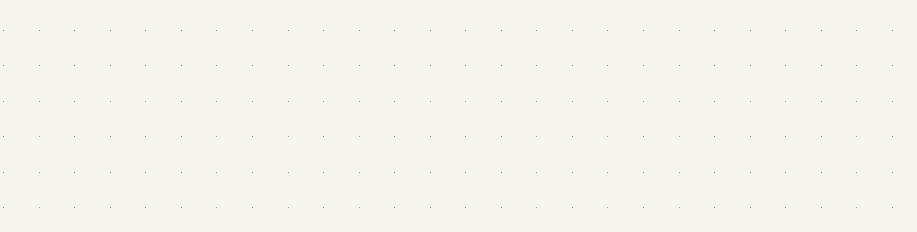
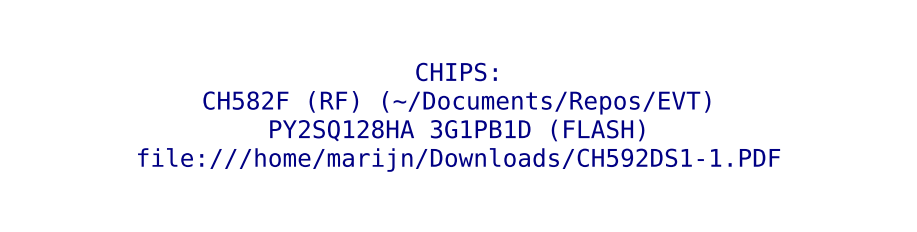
text: none -> CHIPS: (456, 72)
text: none -> CH582F (RF) (~/Documents/Repos/EVT) (456, 102)
text: none -> PY2SQ128HA 3G1PB1D (FLASH) (457, 130)
text: none -> file:///home/marijn/Downloads/CH592DS1-1.PDF (459, 159)

